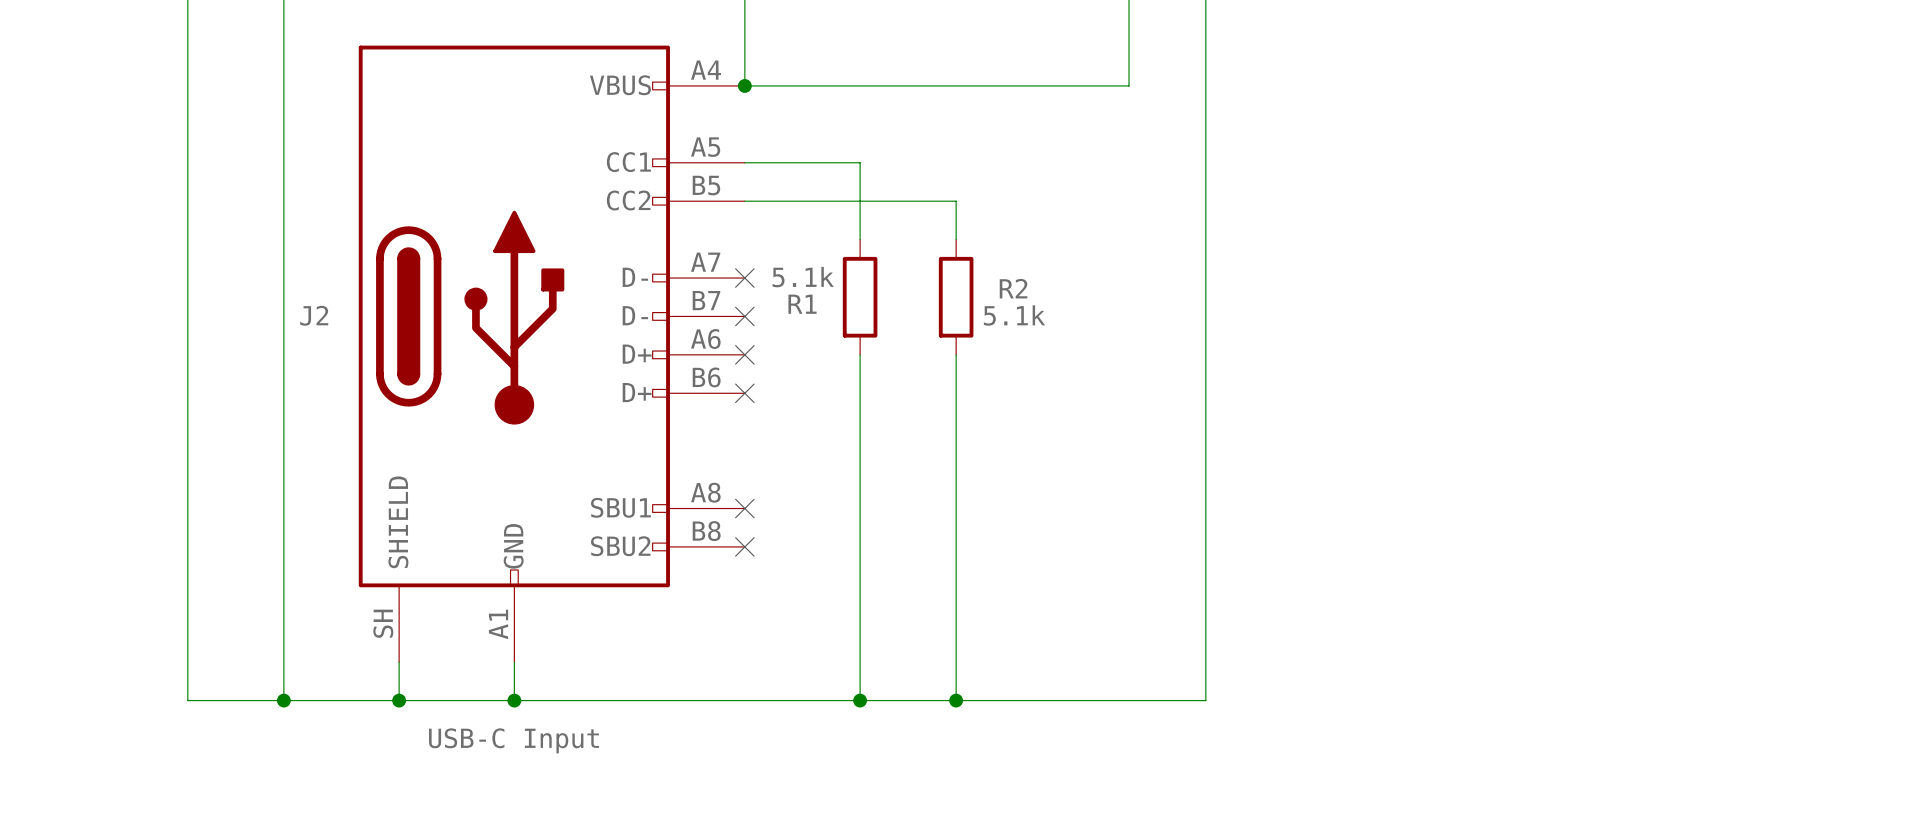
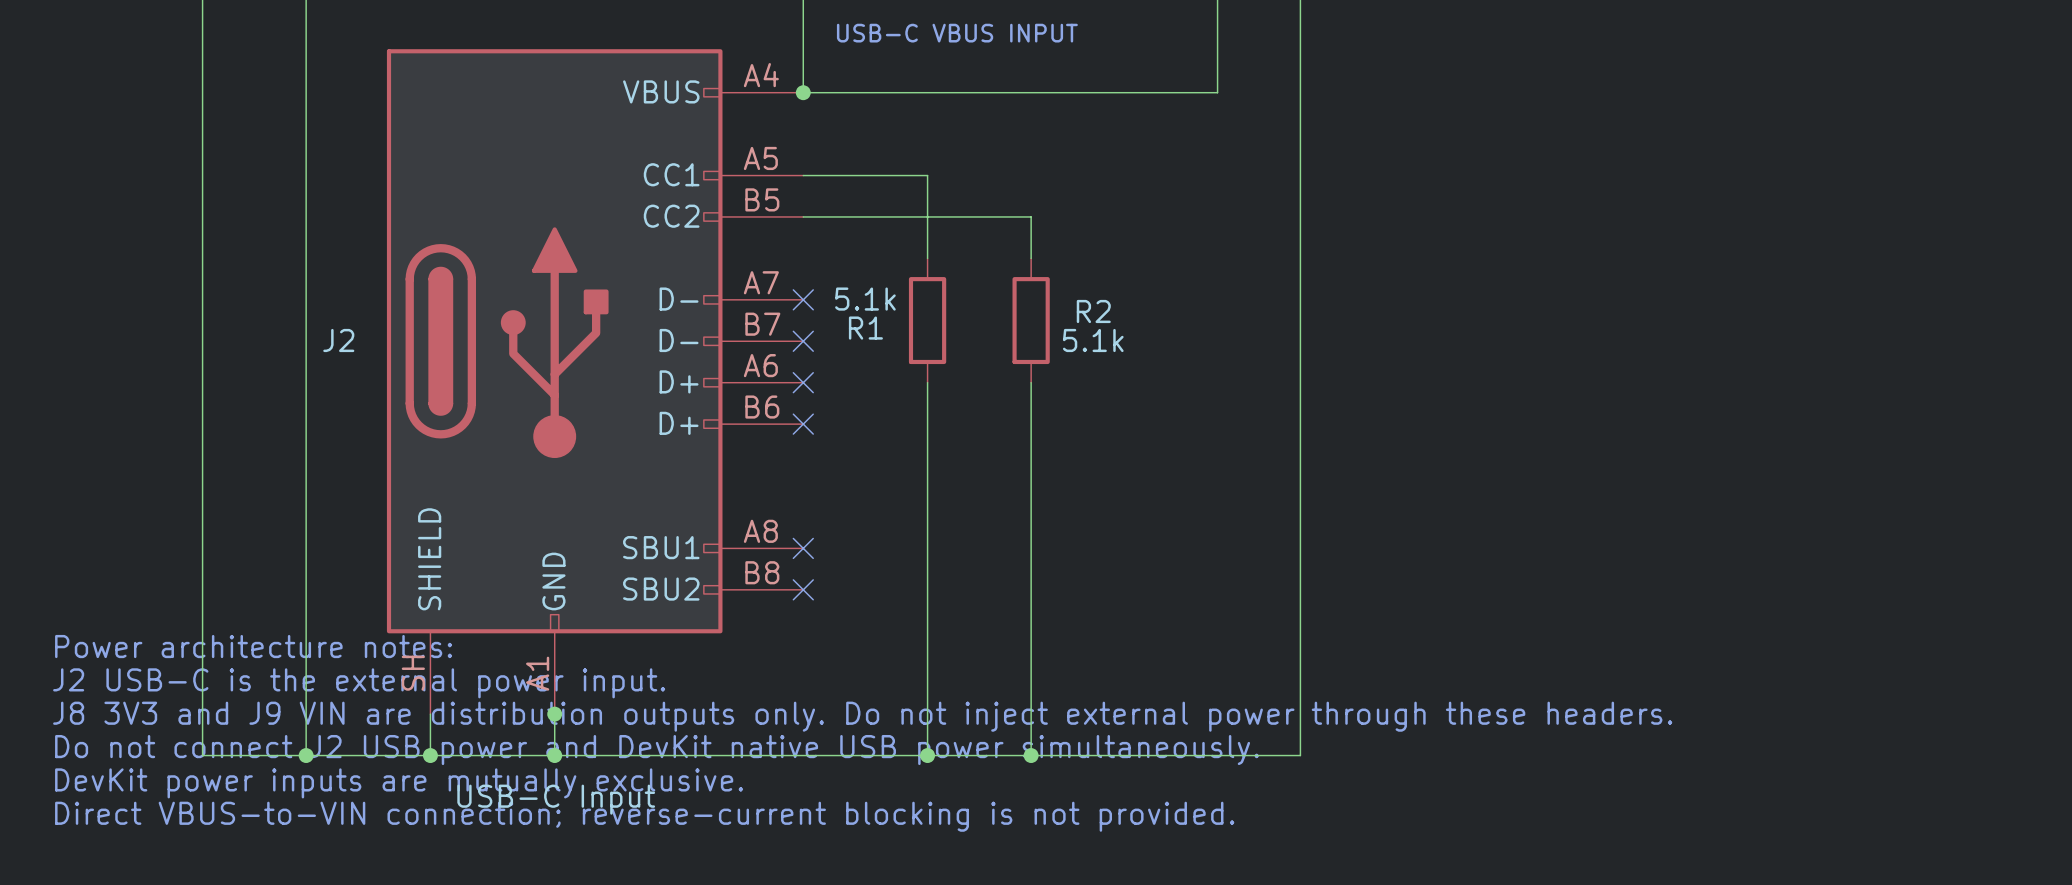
text: none -> USB-C VBUS INPUT (957, 33)
text: none -> Power architecture notes: (253, 646)
text: none -> J2 USB-C is the external power input. (359, 683)
junction: none -> (554, 714)
text: none -> J8 3V3 and J9 VIN are distribution outputs only. Do not inject external power through these headers. (862, 716)
text: none -> Do not connect J2 USB power and DevKit native USB power simultaneously. (657, 750)
text: none -> DevKit power inputs are mutually exclusive. (399, 783)
text: none -> Direct VBUS-to-VIN connection; reverse-current blocking is not provided. (644, 816)

